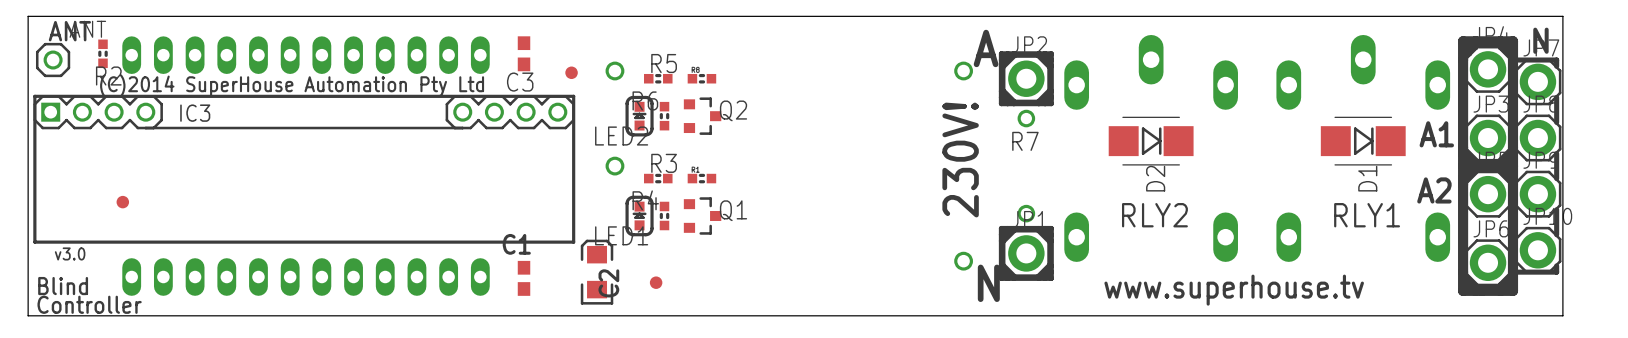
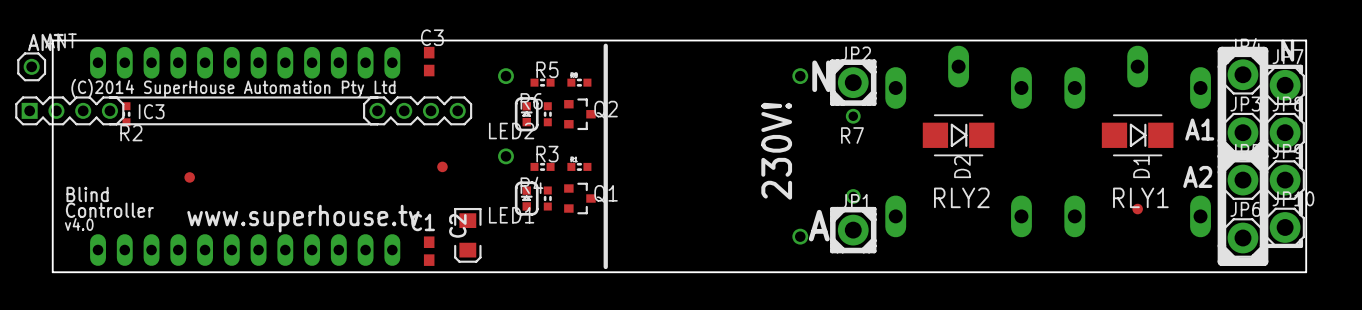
board edge: (1562, 28) (1562, 16) (28, 16) (28, 315) (1562, 315) (1562, 303) -> (1306, 40) (52, 40) (52, 272) (1306, 272)
line: none -> (605, 45) (605, 266)
text position: A (986, 48) -> A (819, 225)
R2 position: (103, 53) -> (126, 114)
part: (571, 72) -> none
C3 name position: C3 (520, 82) -> C3 (432, 37)
line: (34, 96) (34, 242) (573, 242) (573, 96) (34, 96) -> none
text position: 230V! (960, 160) -> 230V! (776, 151)
part: none -> (442, 166)
part position: (122, 202) -> (189, 177)
part: none -> (1137, 209)
text: none -> www.superhouse.tv (303, 218)
text: v3.0 (70, 253) -> v4.0 (79, 224)
C2 rotation: 0° (597, 272) -> 180° (467, 235)
part: (656, 282) -> none
text position: N (988, 283) -> N (821, 76)
text position: Blind (63, 286) -> Blind (87, 194)
text: www.superhouse.tv (1234, 290) -> none
text position: Controller (89, 304) -> Controller (109, 210)

